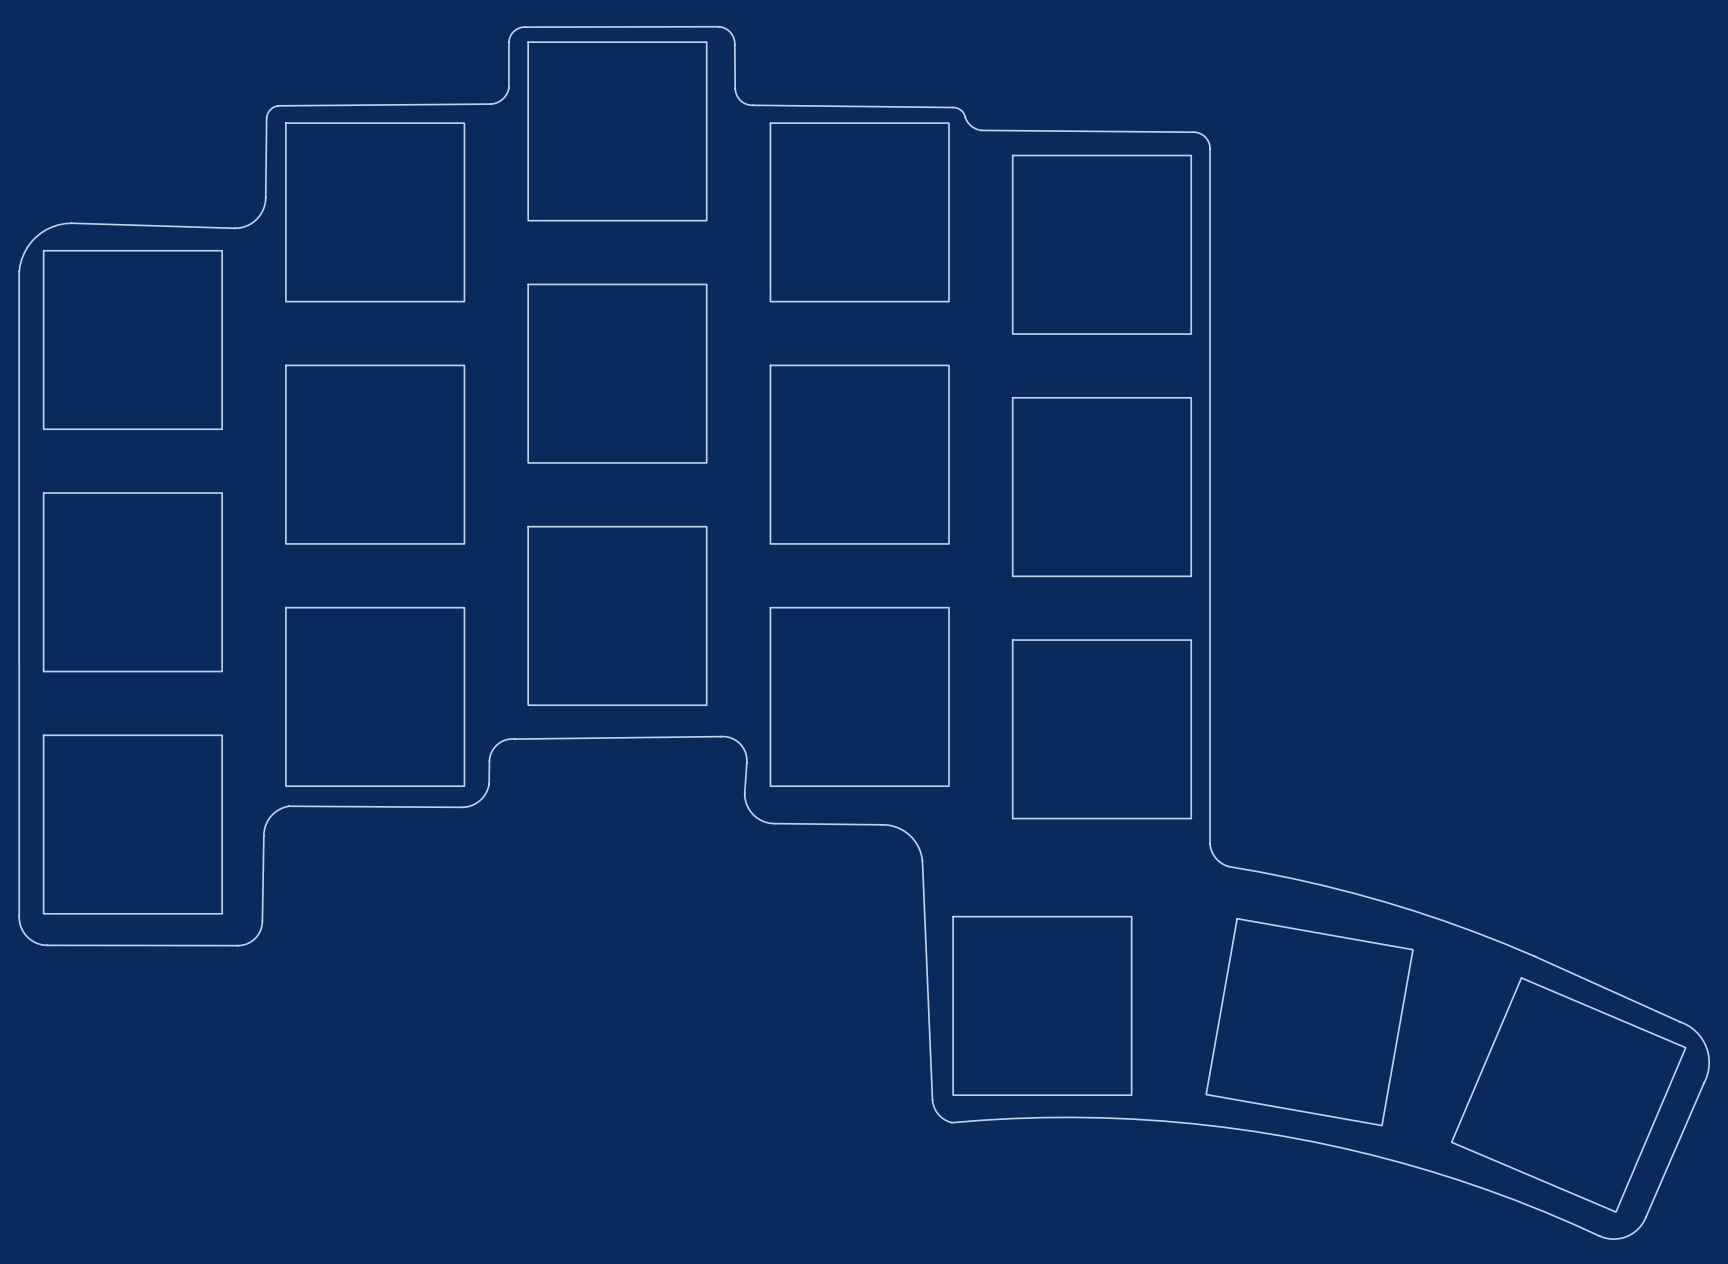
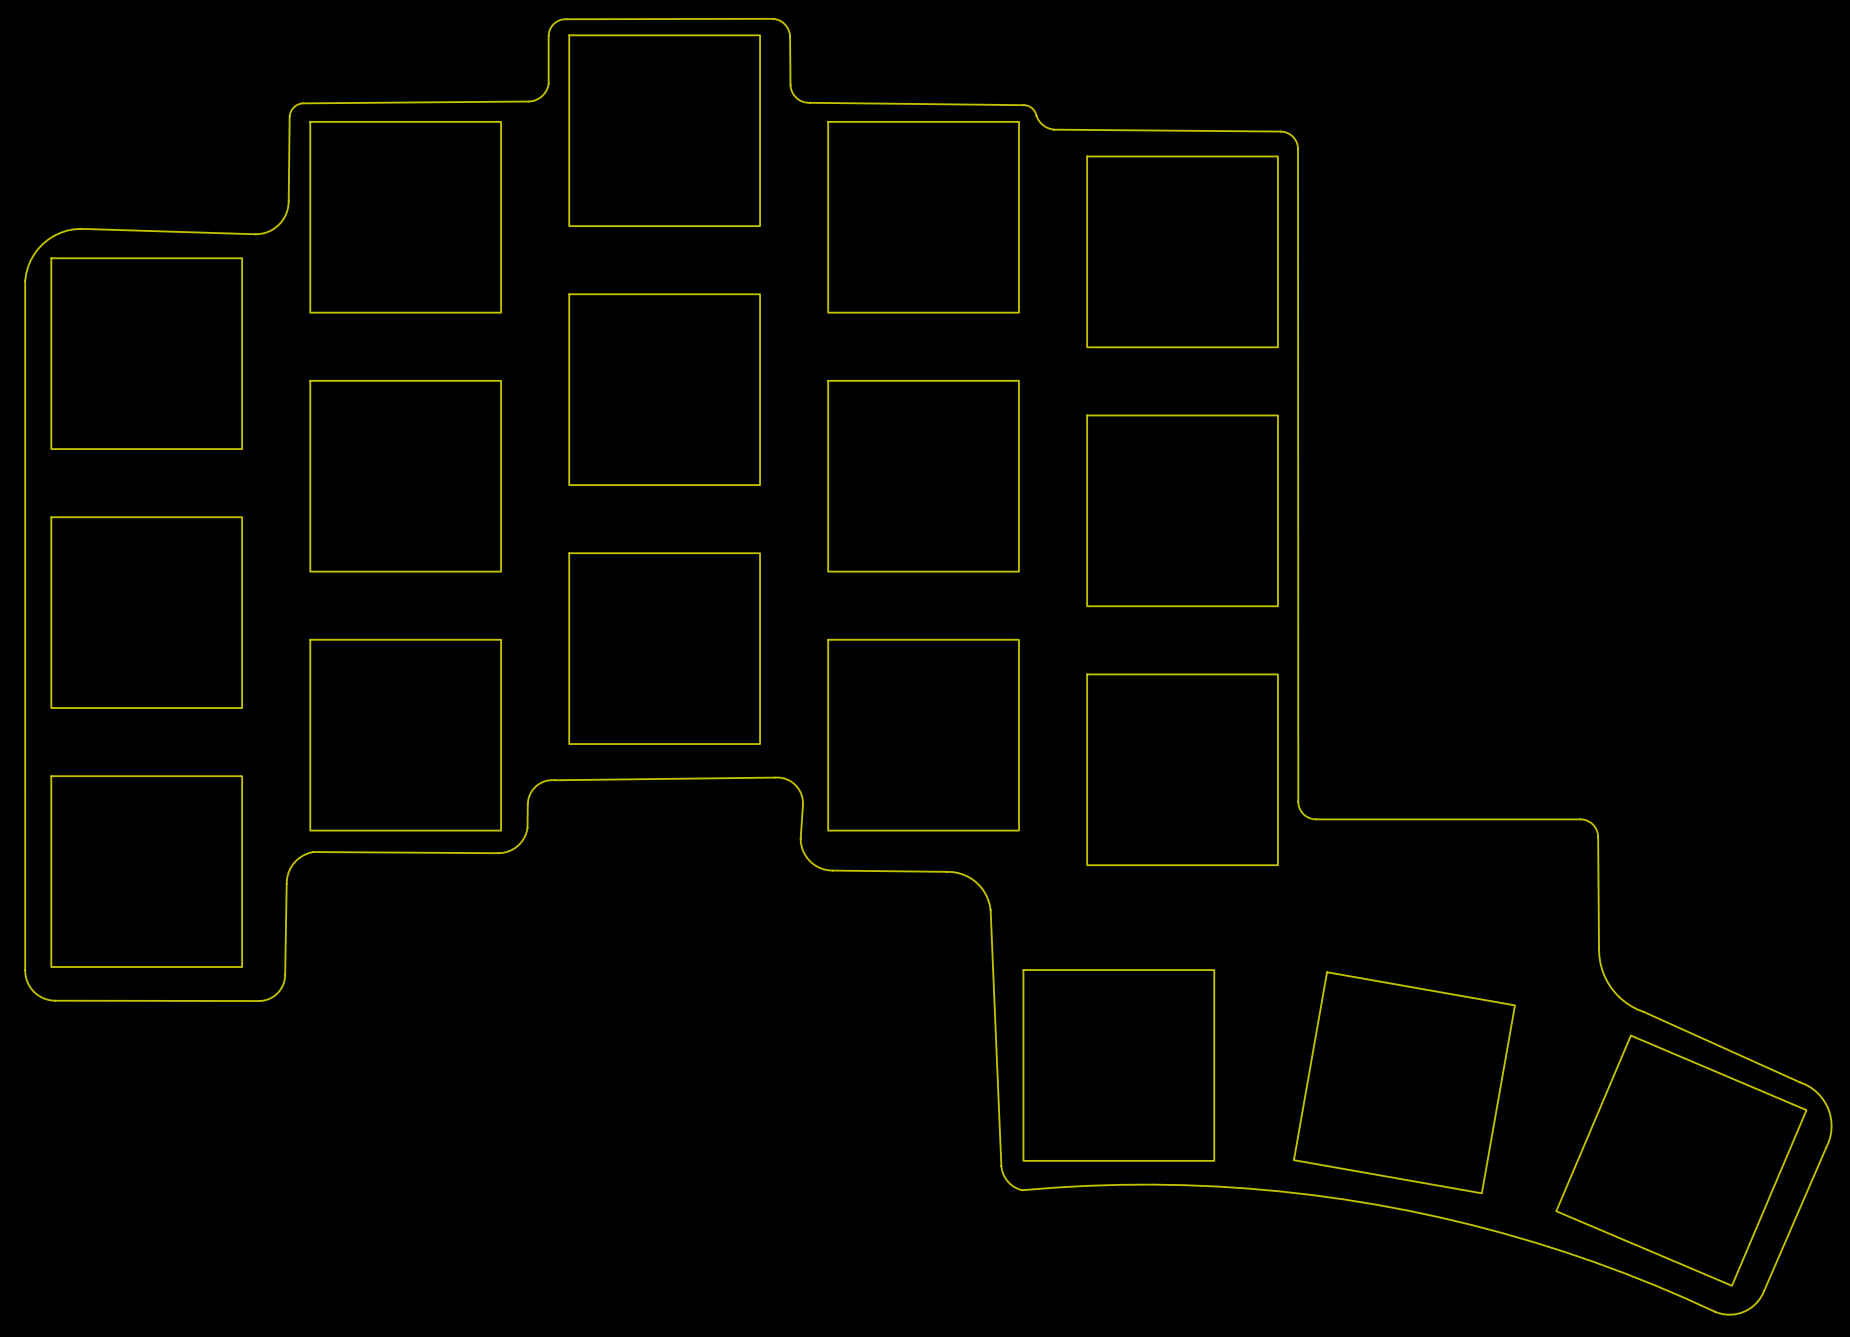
board edge: (1210, 148) (1210, 843) (1212, 852) (1217, 860) (1228, 866) (1291, 878) (1383, 901) (1474, 932) (1533, 956) -> (1298, 149) (1298, 801) (1300, 809) (1306, 816) (1316, 819) (1582, 819) (1594, 826) (1598, 837)
board edge: none -> (1598, 837) (1599, 949) (1602, 969) (1615, 993) (1625, 1002) (1644, 1012)

